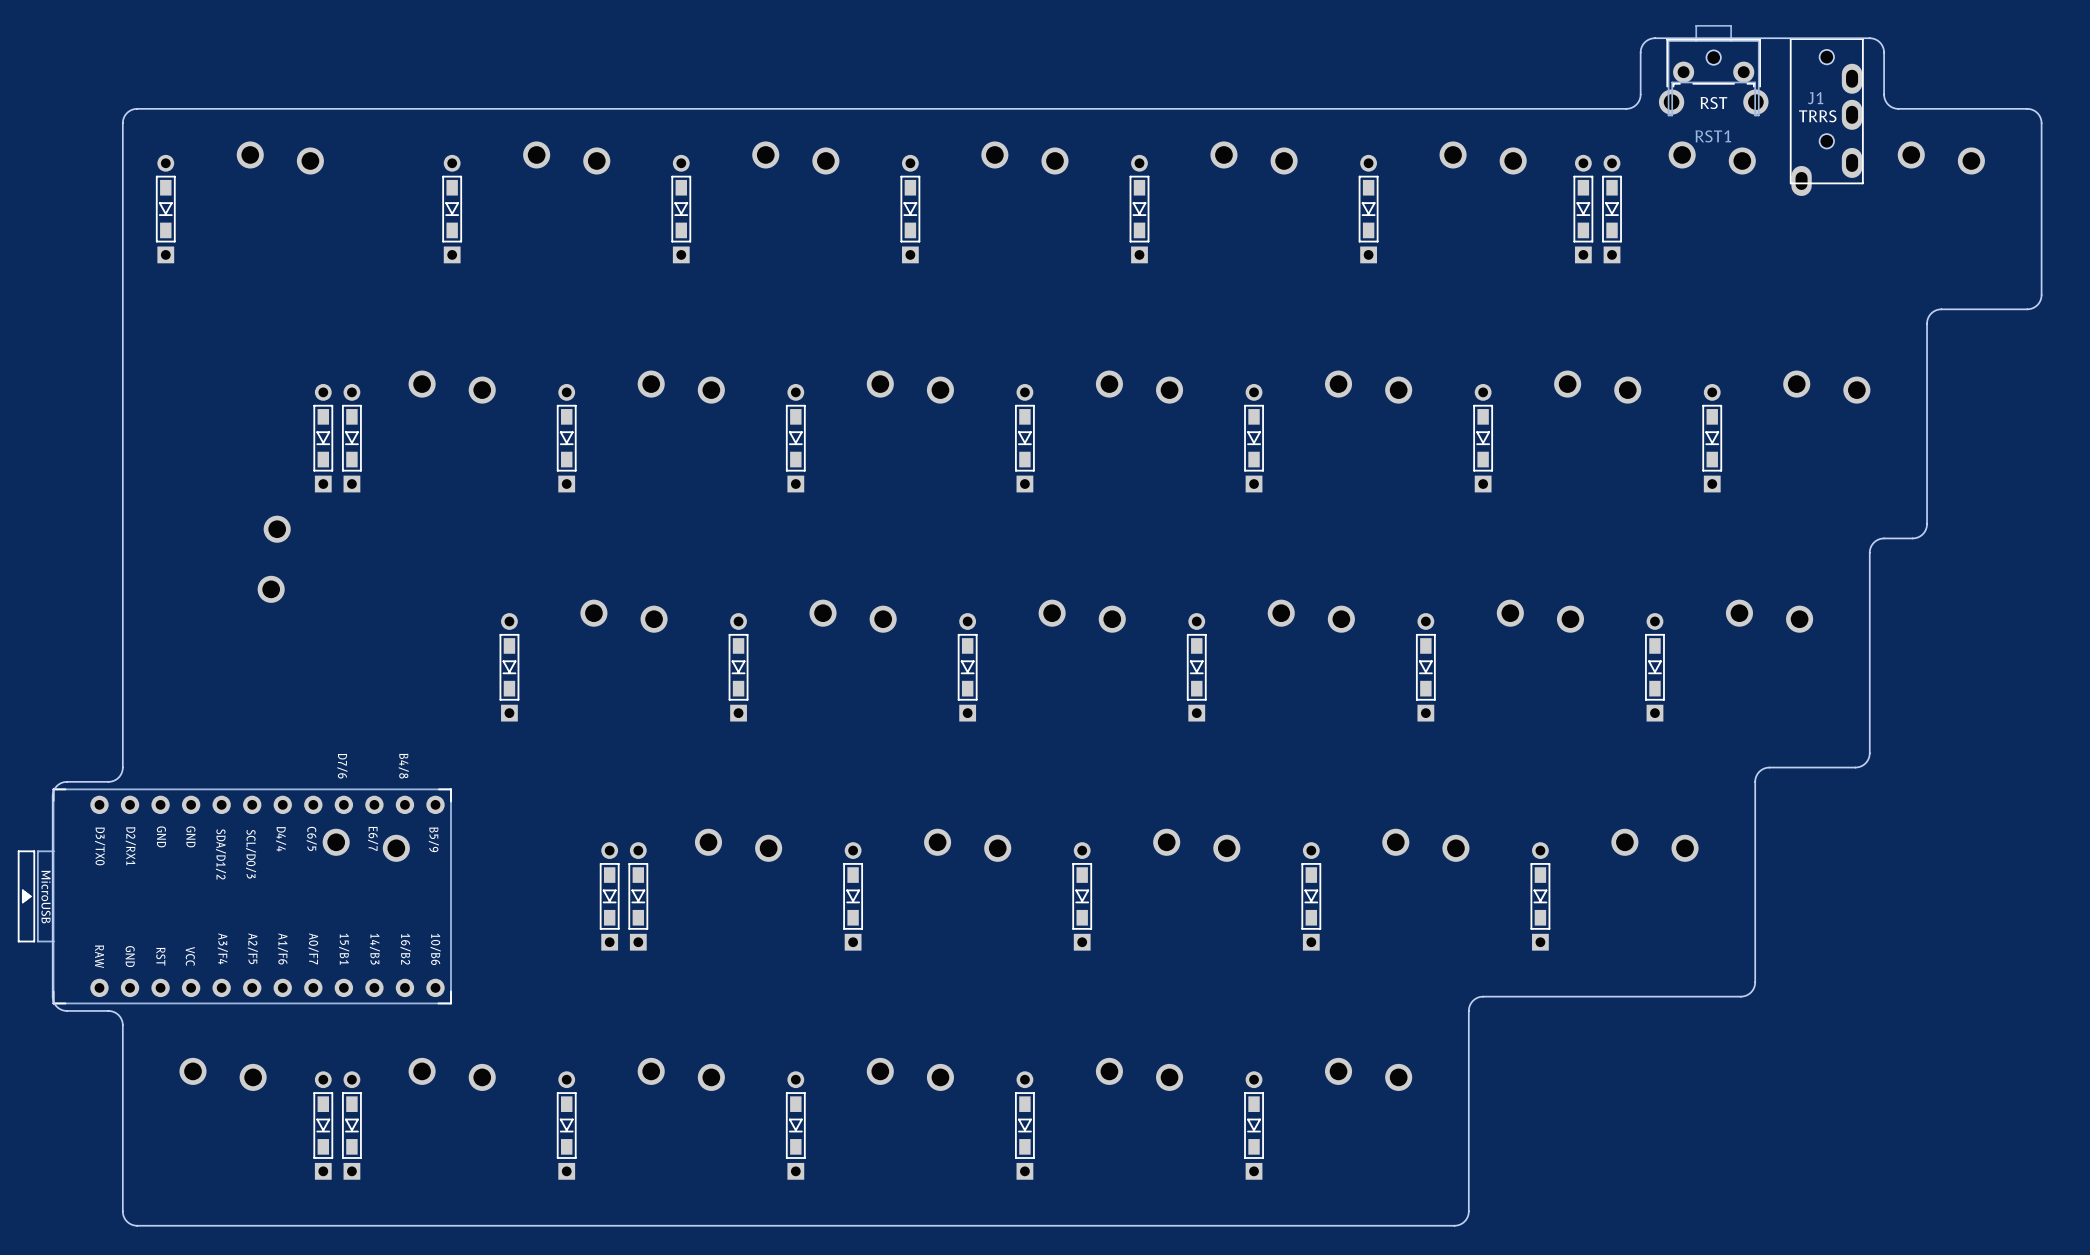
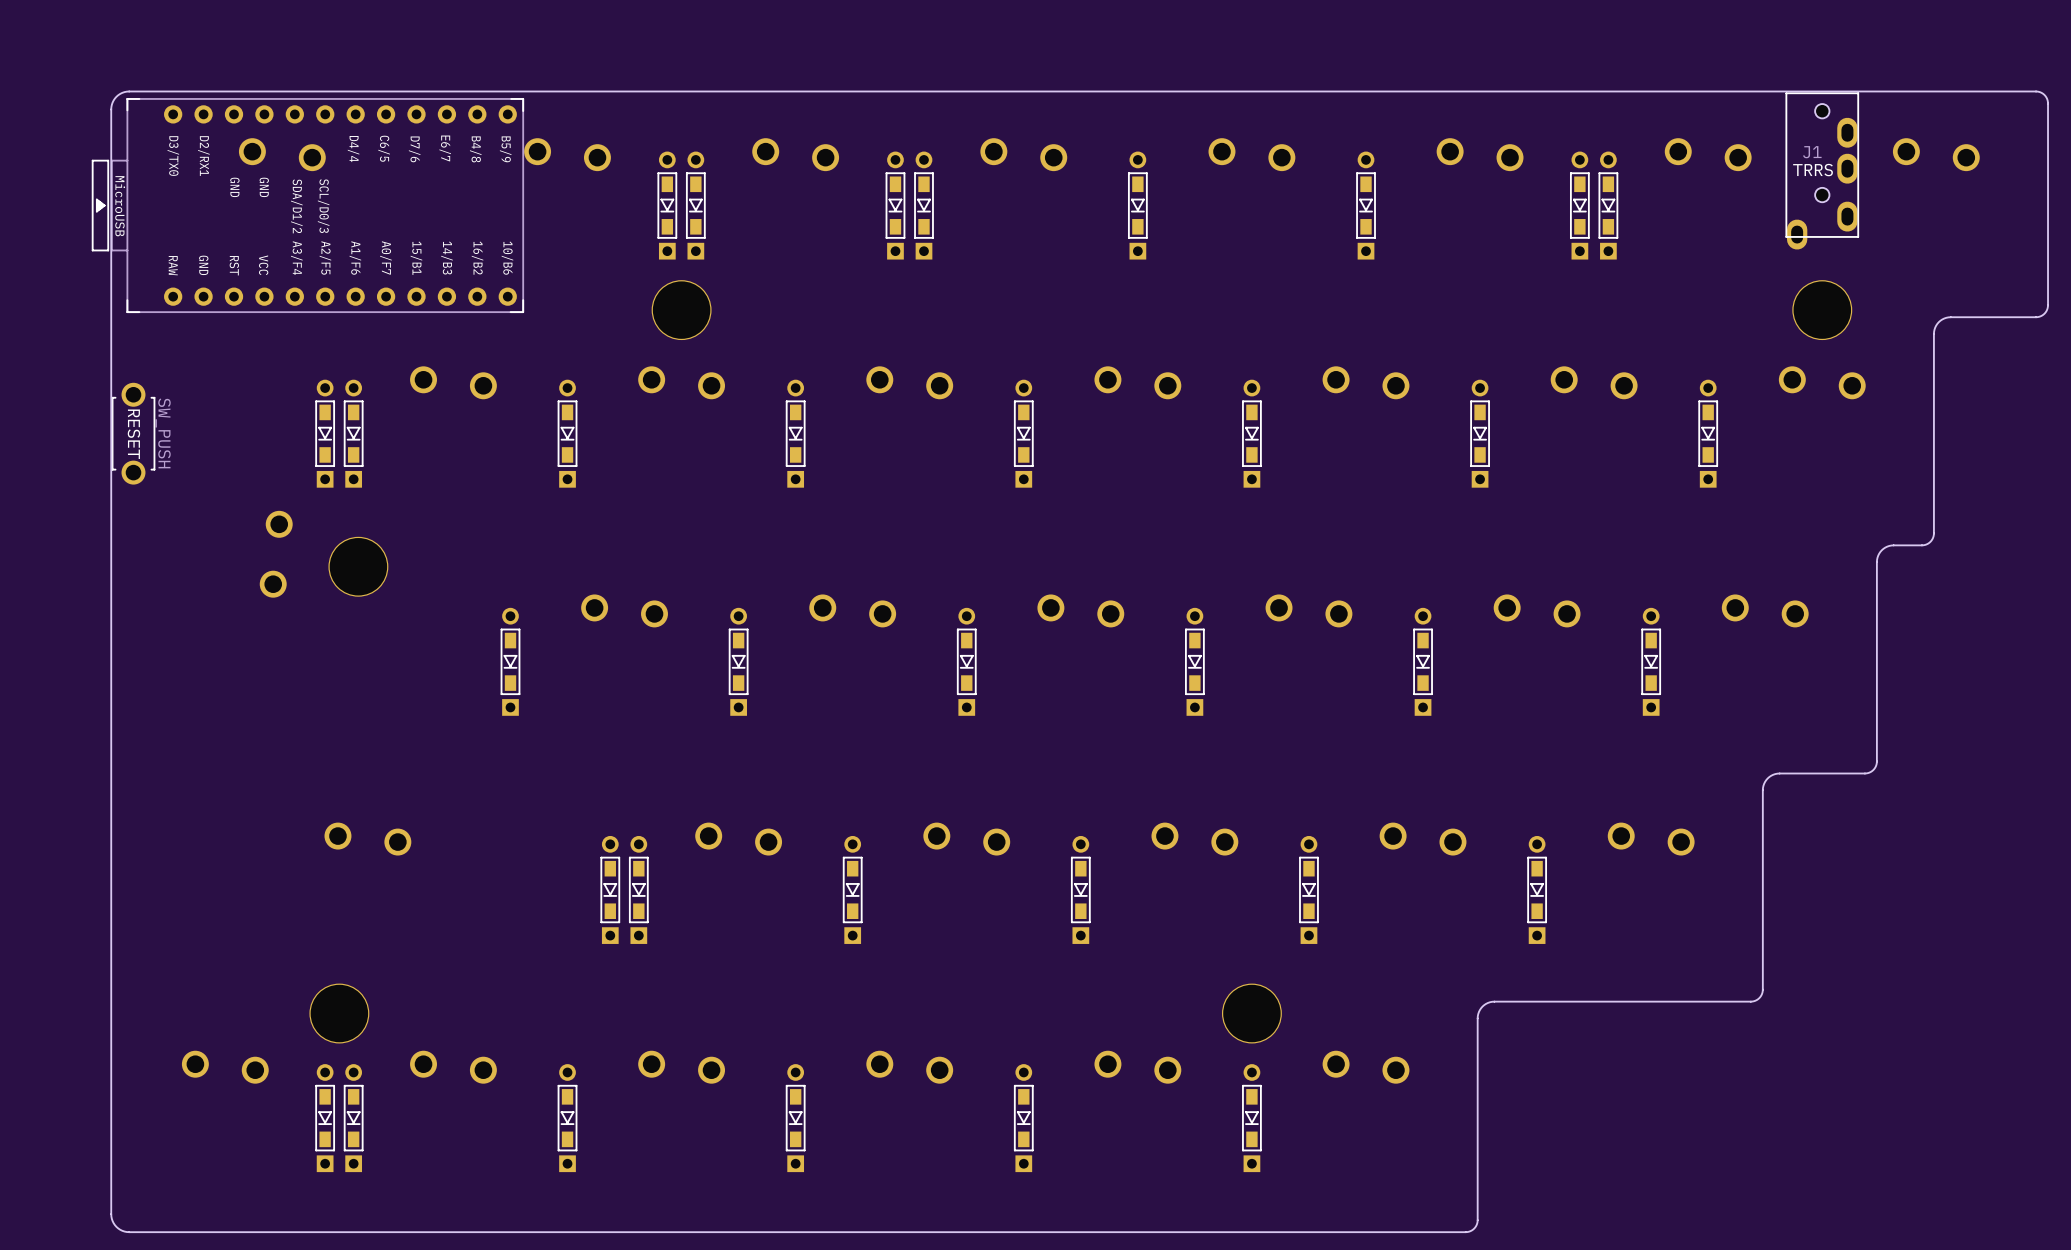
board edge: (1869, 38) (1651, 38) (1644, 42) (1640, 50) (1639, 100) (1635, 105) (1626, 108) (137, 108) (128, 111) (122, 123) (122, 769) (119, 776) (112, 781) (61, 782) (55, 787) (52, 796) (52, 998) (55, 1005) (63, 1010) (110, 1011) (117, 1013) (122, 1021) (122, 1211) (125, 1220) (137, 1225) (1454, 1225) (1463, 1222) (1468, 1211) (1468, 1010) (1474, 999) (1483, 996) (1740, 996) (1748, 994) (1753, 989) (1755, 982) (1755, 781) (1757, 774) (1767, 767) (1857, 767) (1864, 764) (1869, 756) (1869, 550) (1872, 544) (1878, 539) (1916, 537) (1922, 534) (1926, 527) (1928, 318) (1932, 312) (1939, 309) (2029, 309) (2035, 306) (2040, 300) (2041, 123) (2039, 116) (2034, 110) (2027, 108) (1892, 107) (1887, 103) (1884, 96) (1883, 48) (1878, 41) (1869, 38) -> (2036, 91) (2044, 94) (2048, 103) (2047, 308) (2044, 313) (2037, 317) (1948, 317) (1940, 320) (1935, 327) (1933, 534) (1931, 540) (1925, 544) (1887, 546) (1880, 551) (1877, 557) (1876, 761) (1875, 767) (1870, 771) (1864, 773) (1777, 773) (1769, 776) (1765, 781) (1762, 790) (1762, 989) (1761, 995) (1756, 1000) (1750, 1001) (1494, 1001) (1488, 1002) (1481, 1008) (1477, 1018) (1477, 1220) (1476, 1226) (1471, 1230) (1465, 1232) (129, 1232) (120, 1229) (113, 1223) (111, 1214) (111, 109) (113, 100) (120, 93) (129, 91) (2036, 91)
RST1: (1713, 70) -> none
J1 position: (1826, 117) -> (1822, 170)
part: (165, 209) -> none
part: none -> (307, 205)
part: (452, 209) -> none
part: none -> (667, 205)
part: (681, 209) -> none
part: none -> (695, 205)
part: none -> (895, 205)
part: (910, 209) -> none
part: none -> (923, 205)
part: none -> (681, 310)
part: none -> (1822, 310)
part: none -> SW_PUSH (133, 433)
part: none -> (358, 566)
part: (234, 896) -> none
part: none -> (339, 1013)
part: none -> (1251, 1013)

